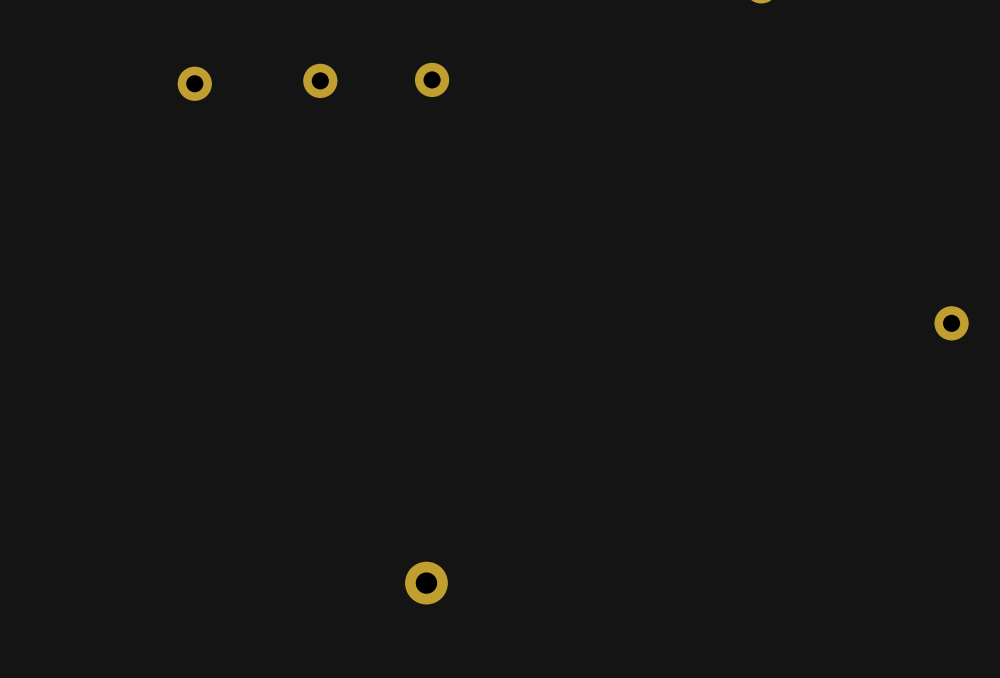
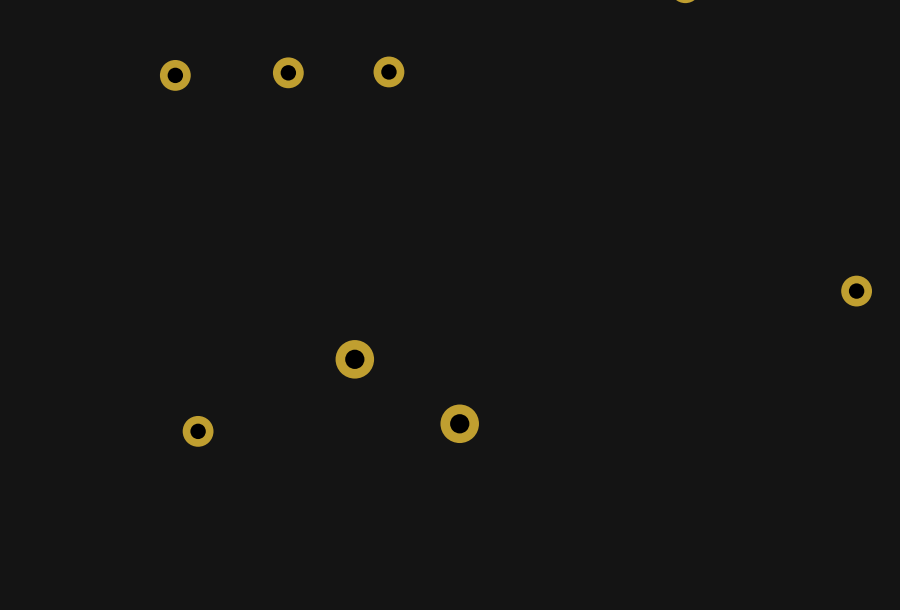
via: none -> (354, 359)
via: none -> (459, 423)
via: none -> (198, 431)
via: (426, 583) -> none

